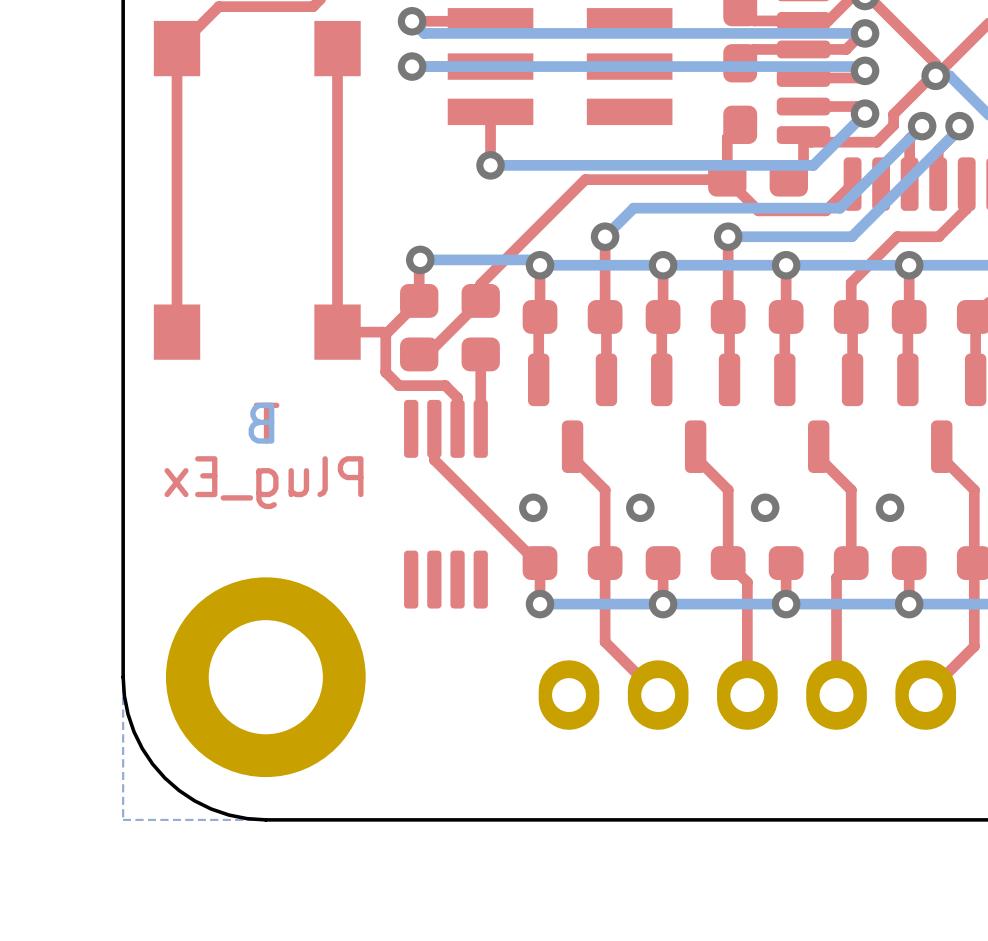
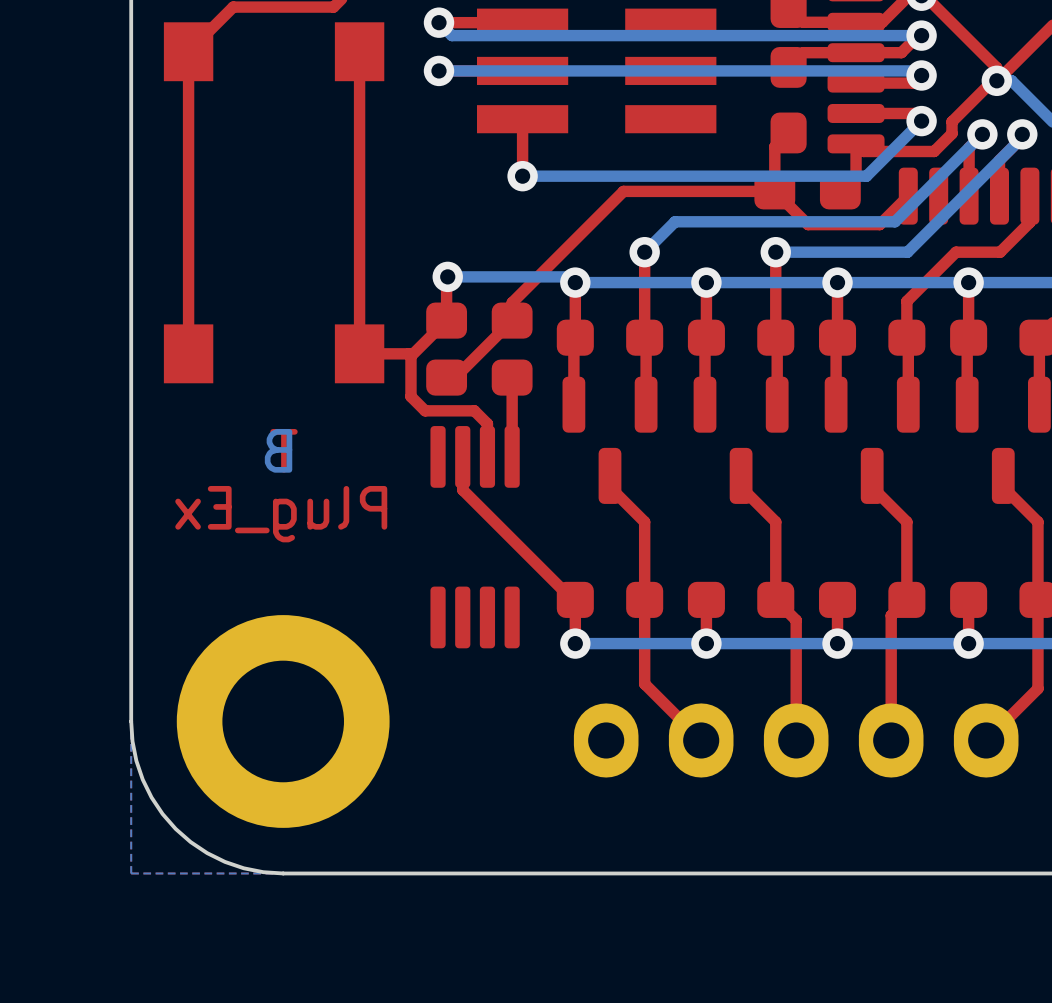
via: (533, 507) -> none
via: (640, 507) -> none
via: (765, 507) -> none
via: (890, 507) -> none

